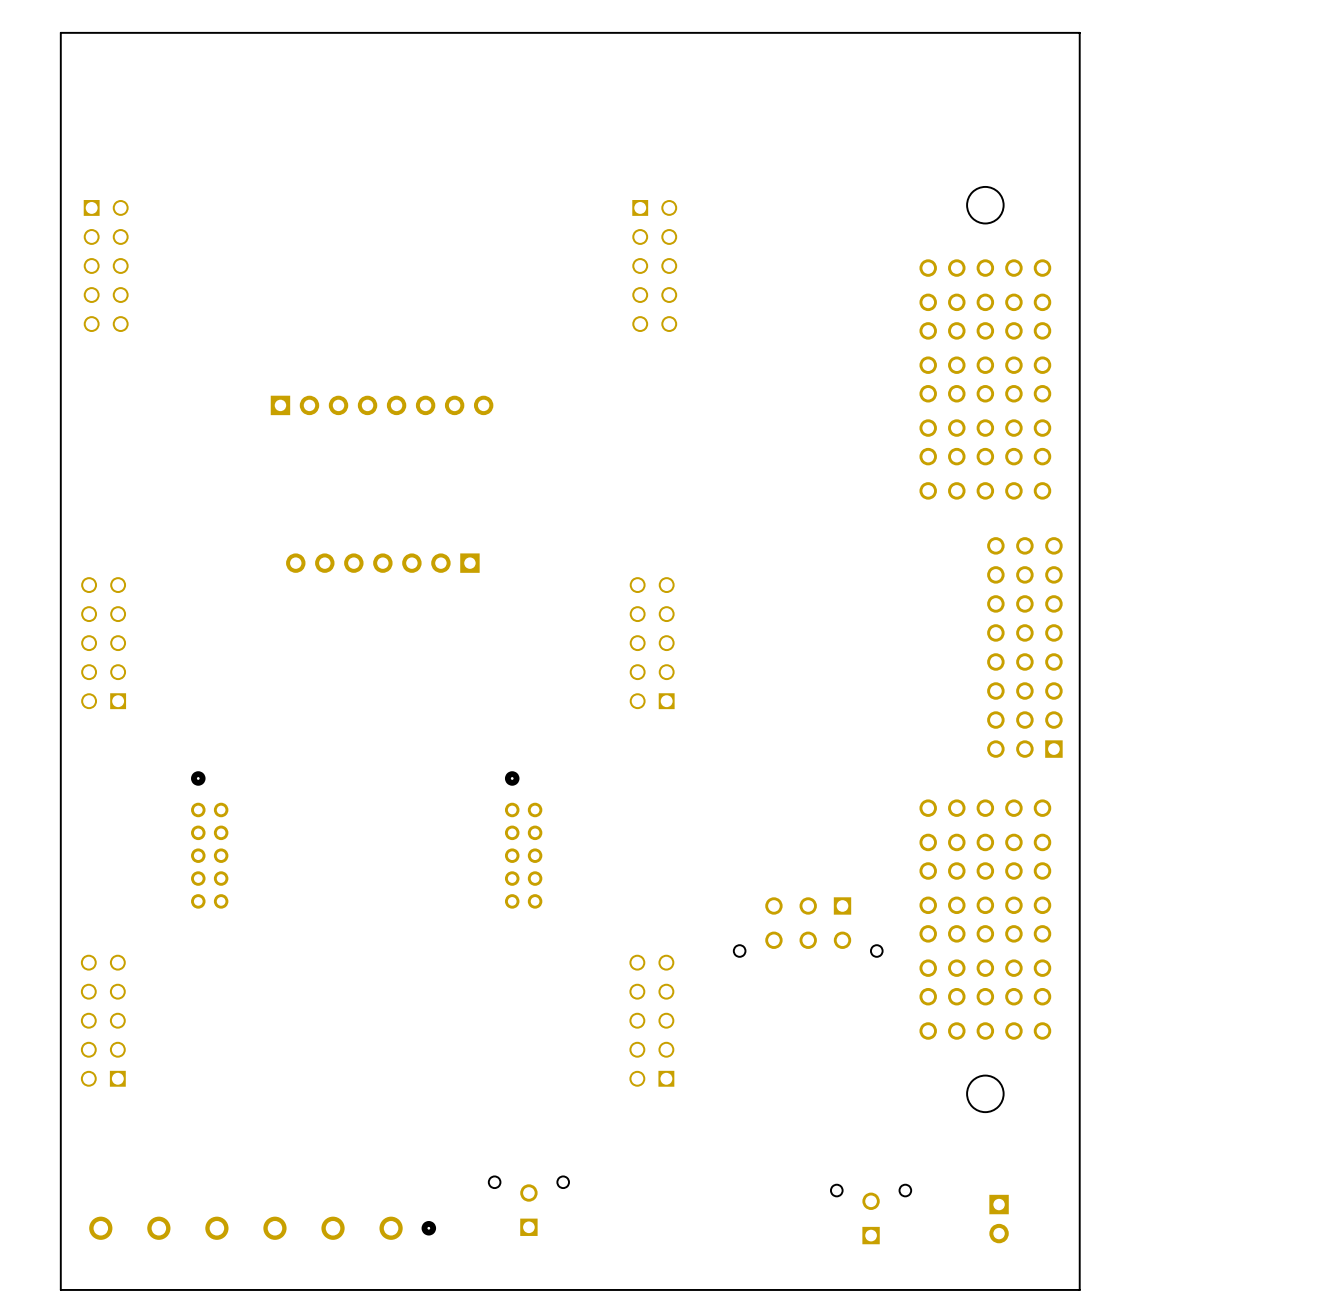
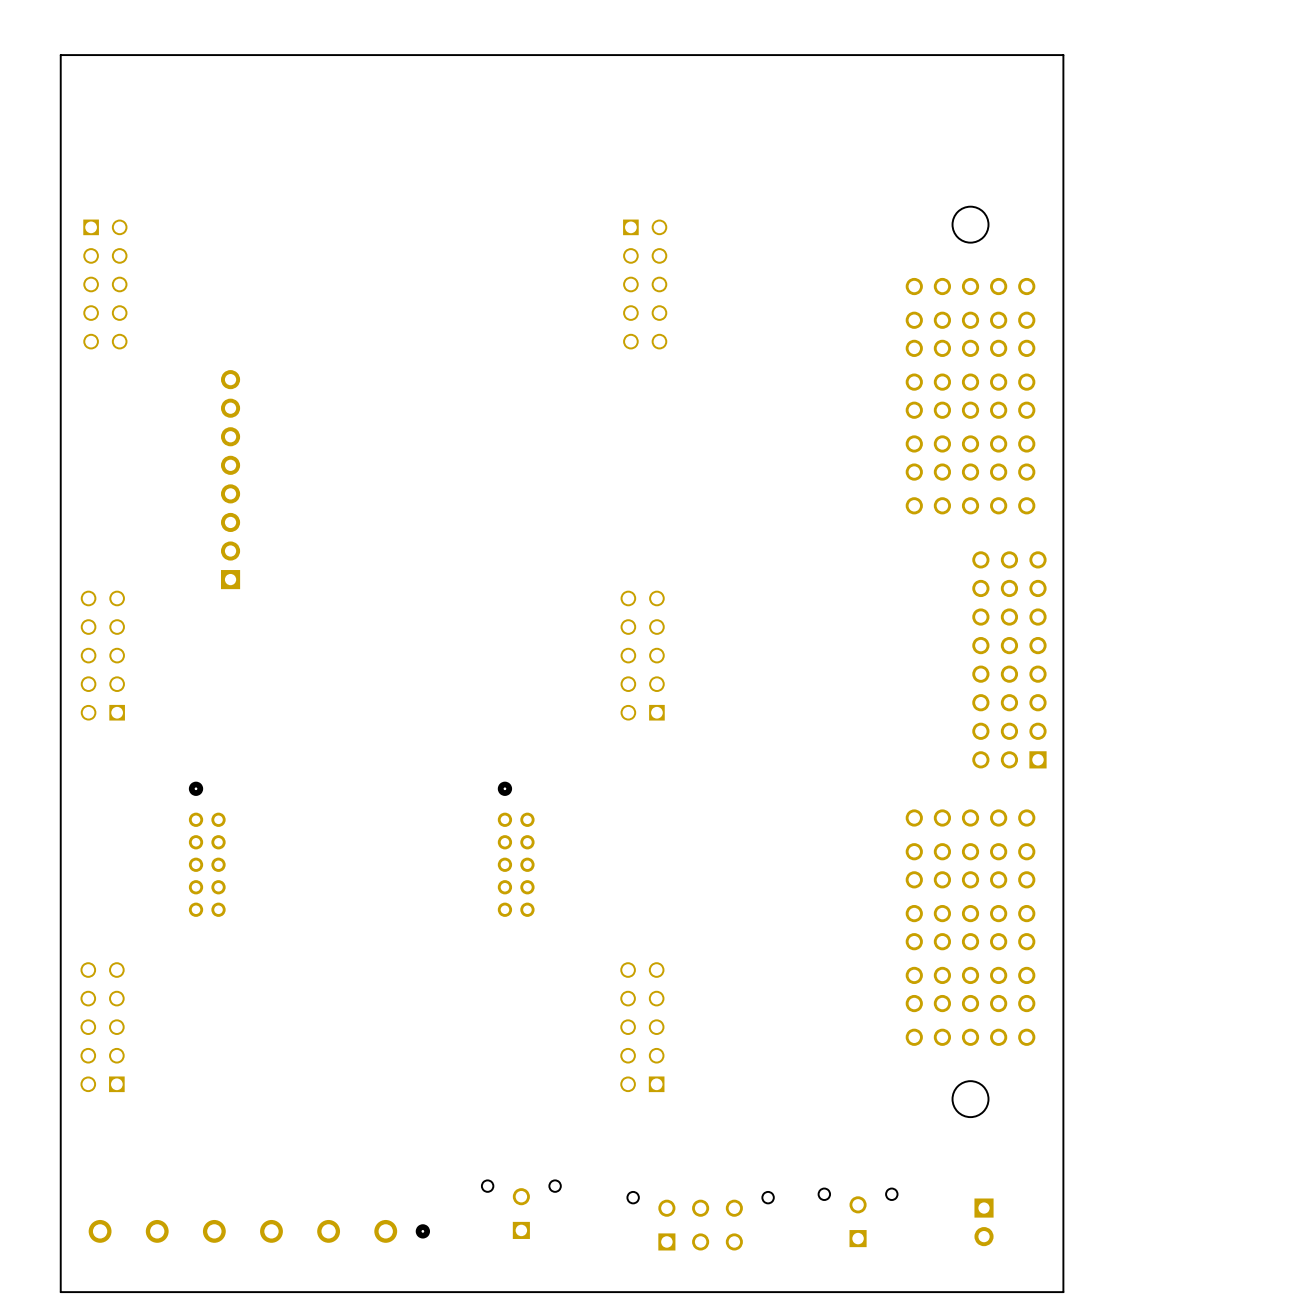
part rotation: 0° (382, 405) -> 90° counterclockwise (230, 479)
part position: (382, 405) -> (230, 479)
part: (382, 563) -> none
part: (808, 927) -> none
part: none -> (700, 1221)

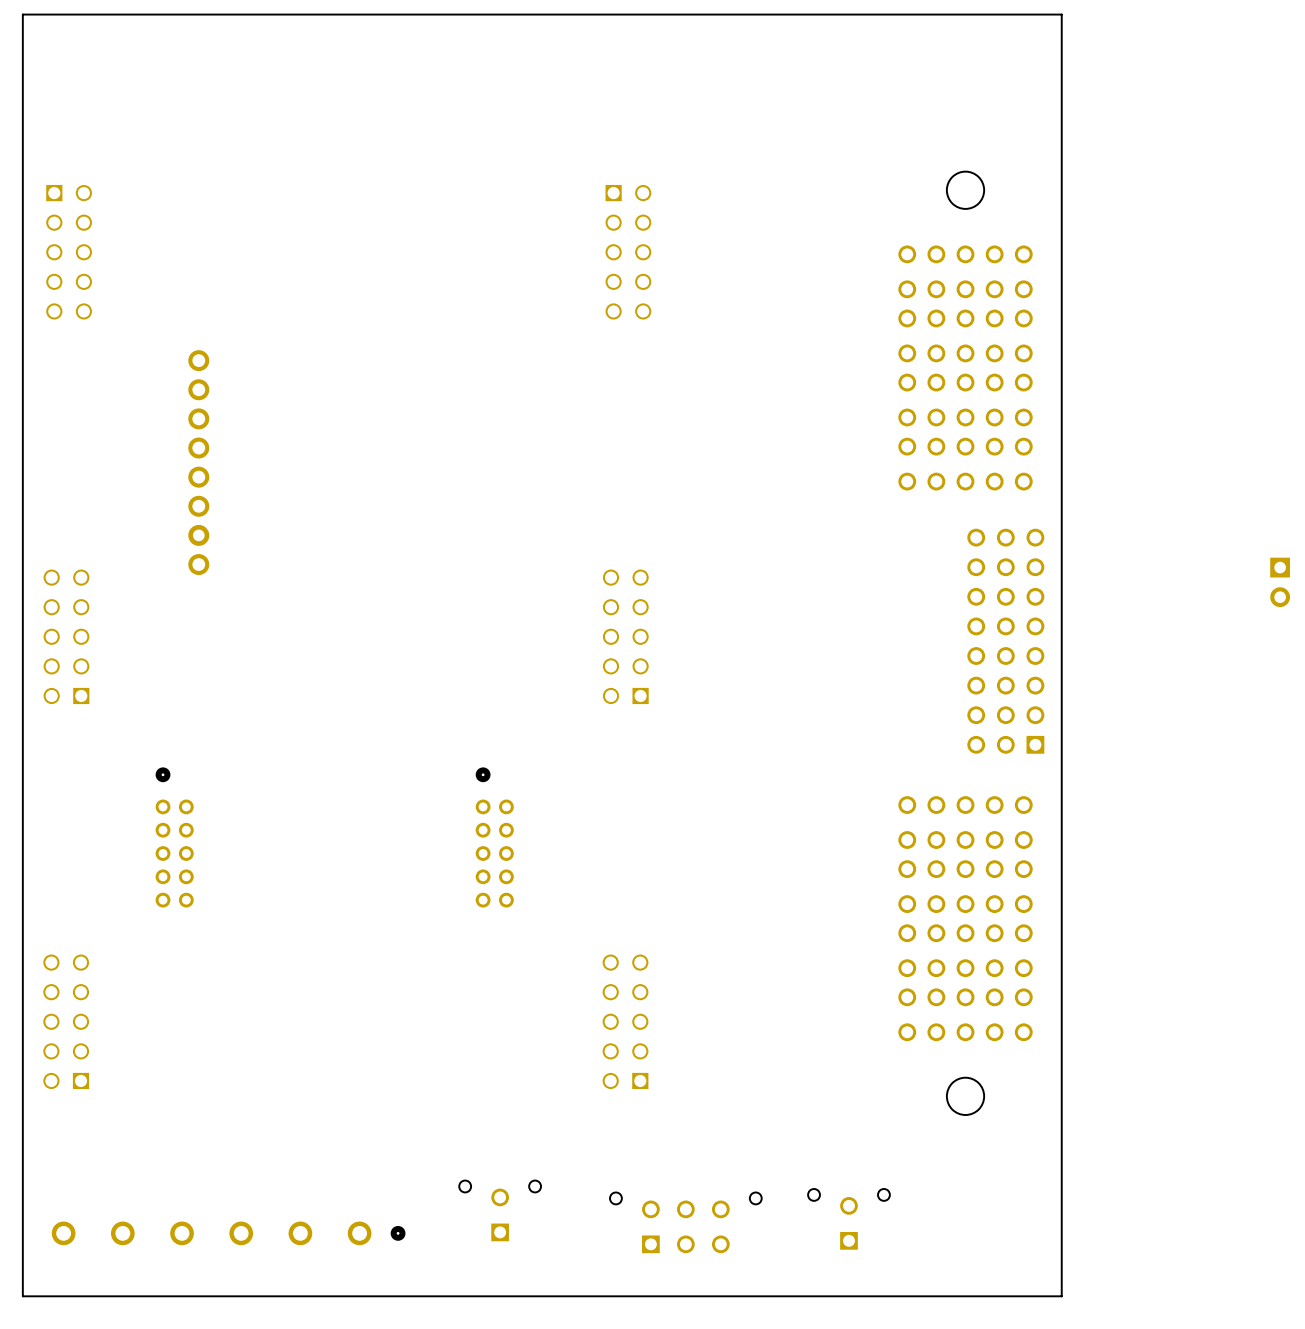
part footprint: [220, 370, 241, 590] -> [188, 350, 210, 576]
part: none -> (1280, 582)
part: (984, 1222) -> none

